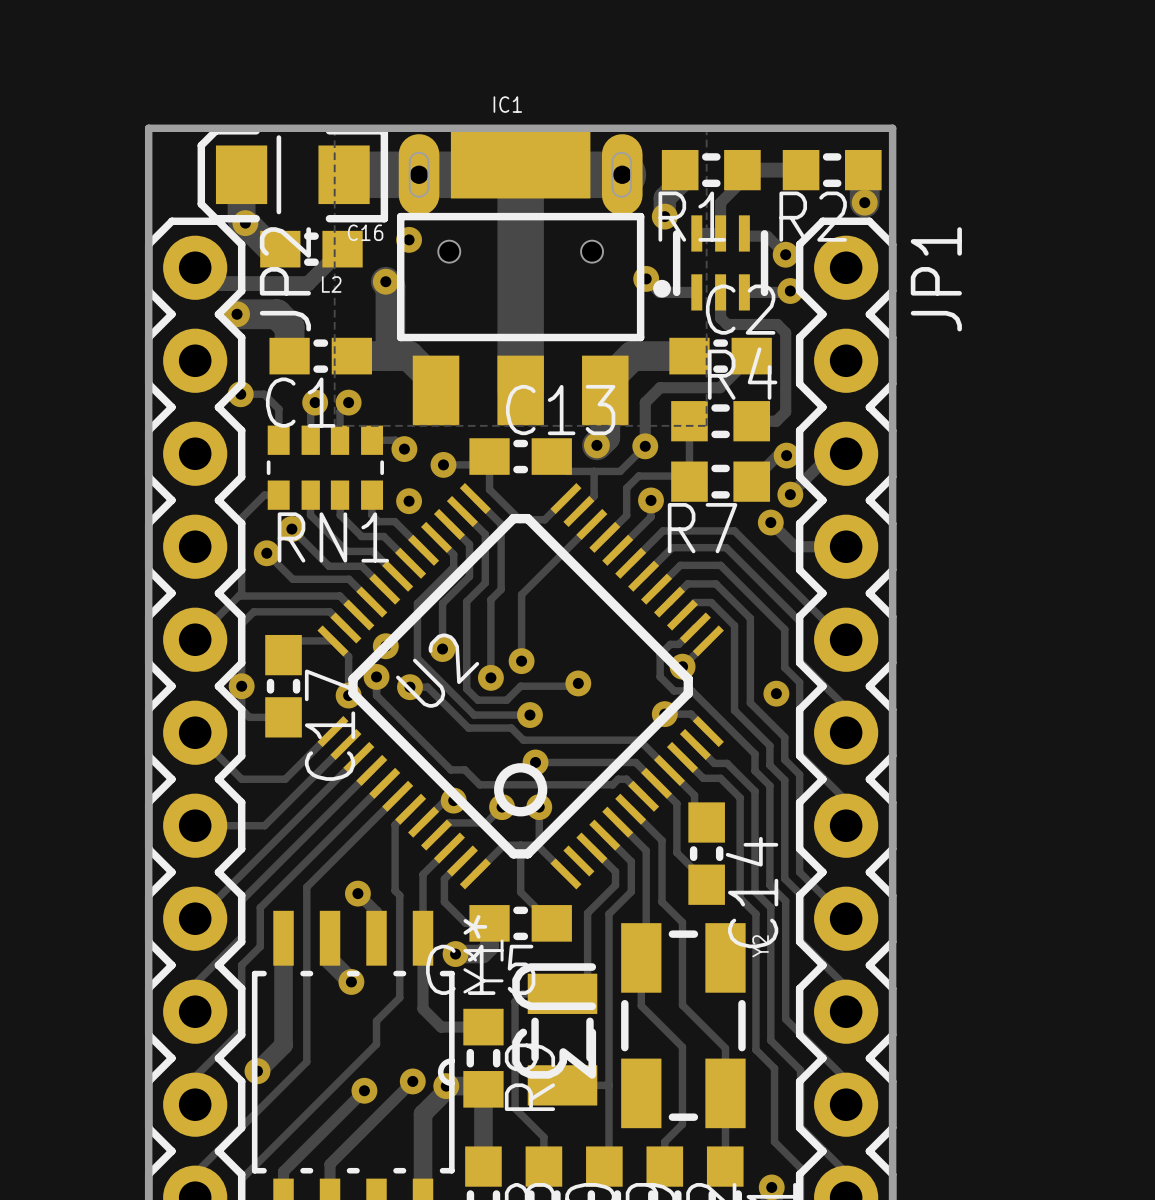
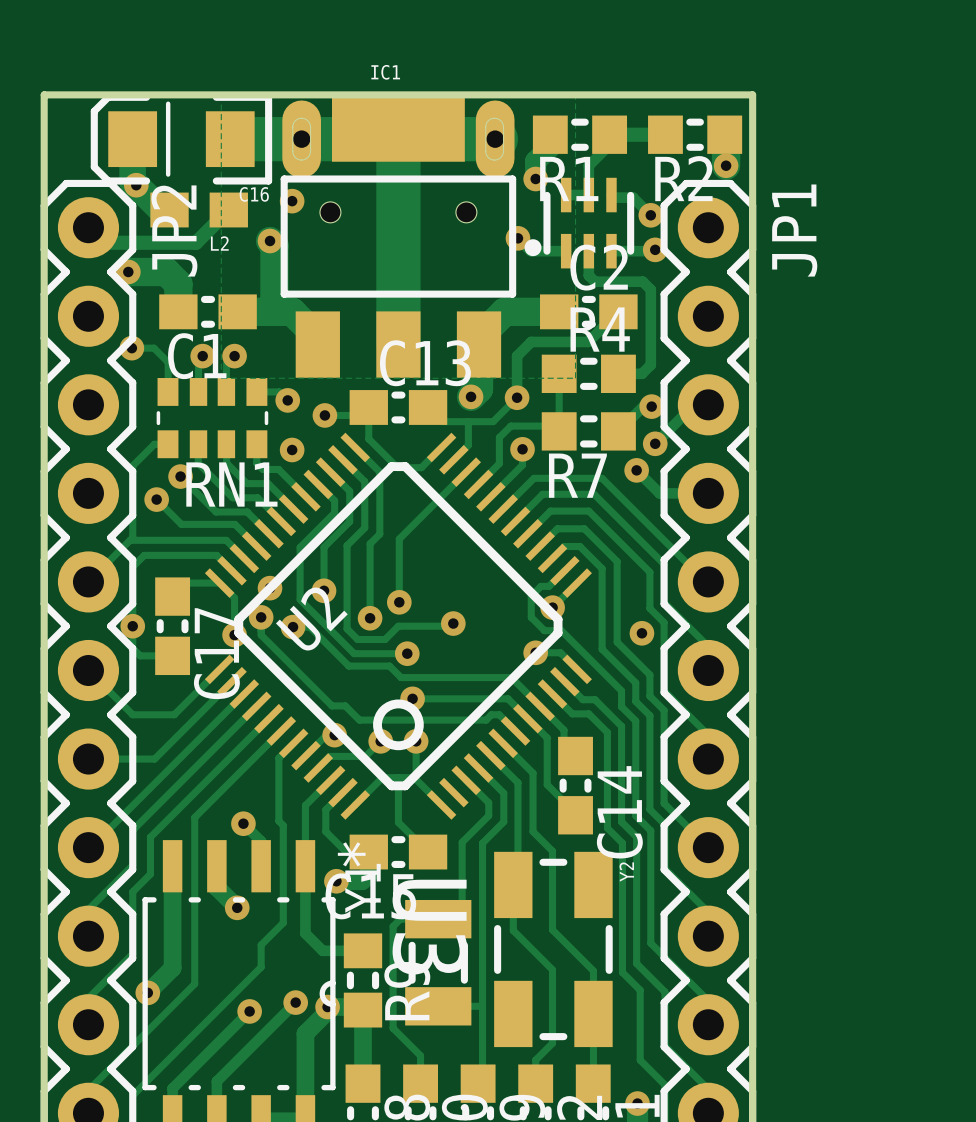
L2 footprint: [260, 230, 363, 268] -> [150, 192, 248, 228]

